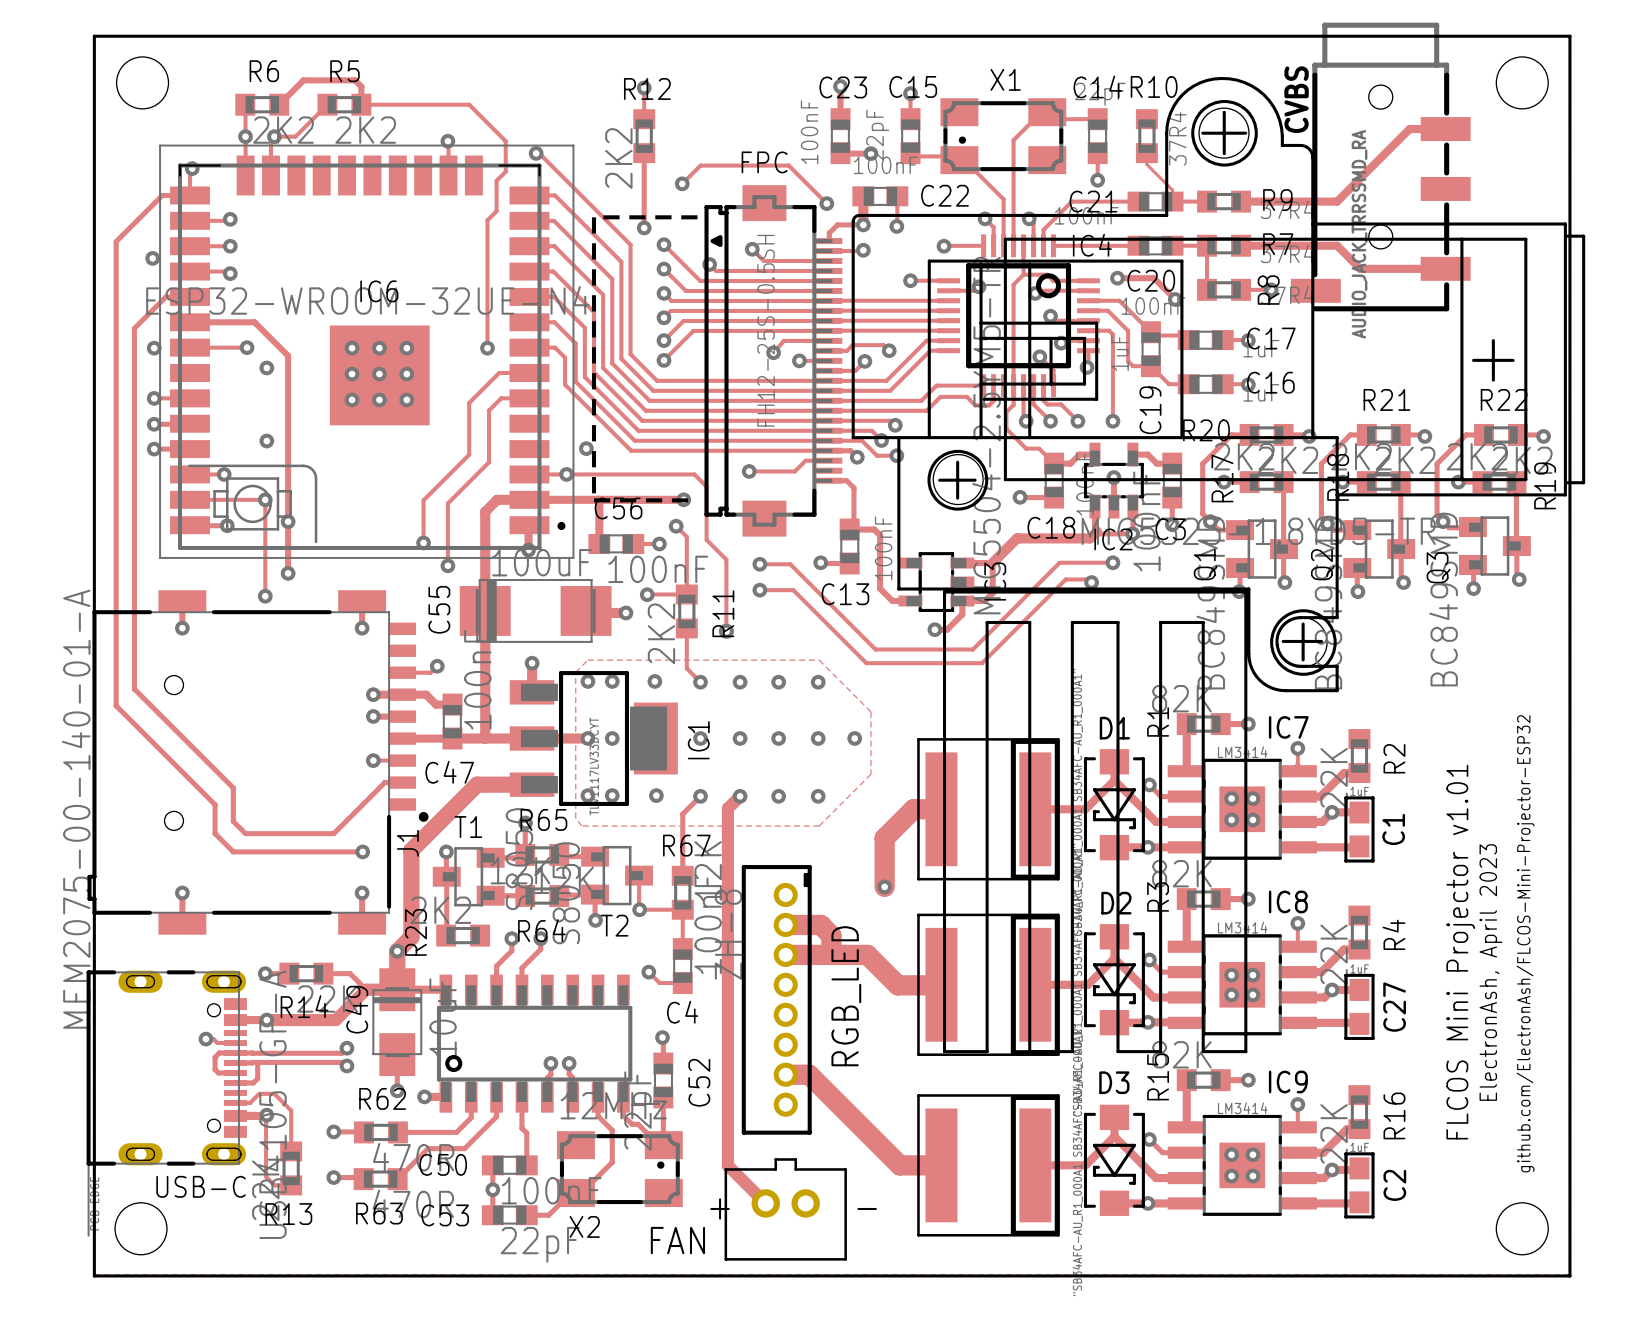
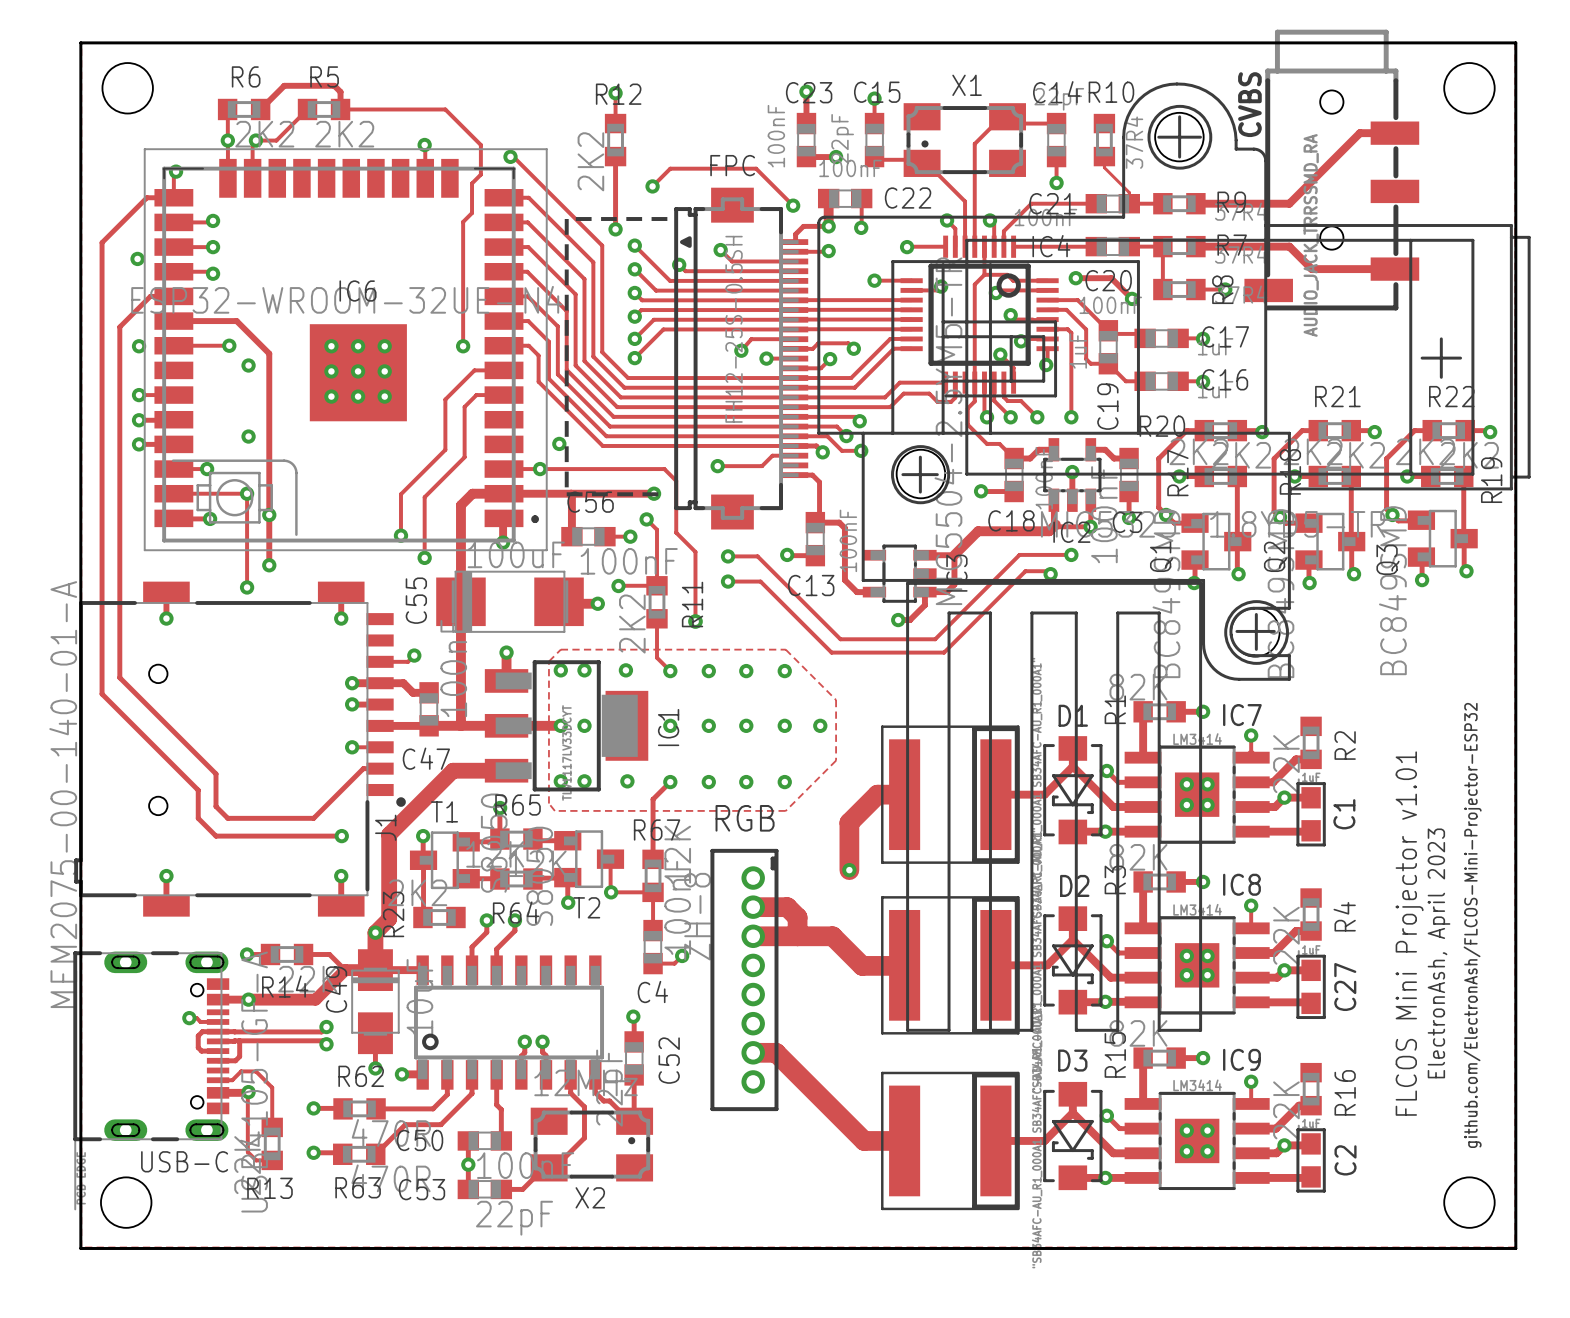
track: (740, 796) (727, 808) (727, 1165) (765, 1203) -> none
track: (648, 972) (659, 983) (682, 983) -> (682, 955) (674, 963) (653, 963)
via position: (648, 972) -> (682, 955)
RGB_LED name: RGB_LED (846, 996) -> RGB (745, 818)
FAN: (785, 1209) -> none
X2 name position: X2 (584, 1226) -> X2 (590, 1197)

